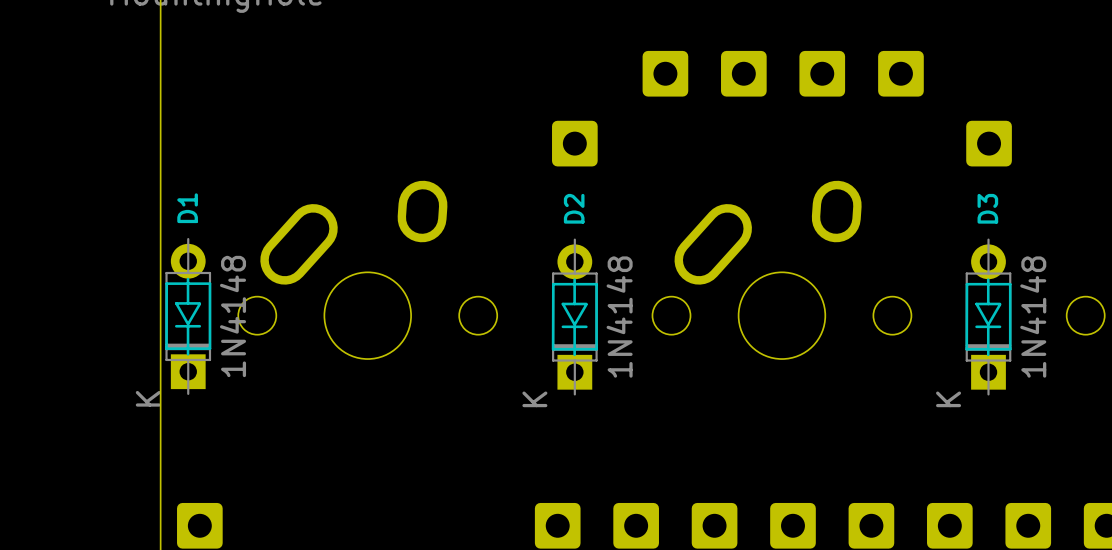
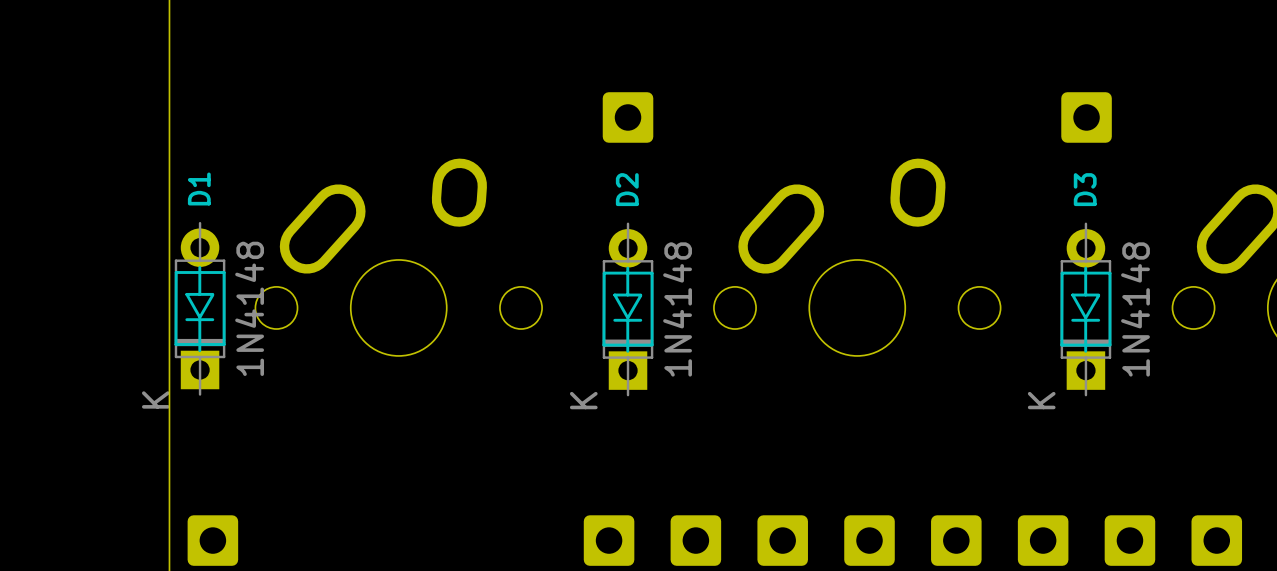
part: (665, 73) -> none
part: (743, 73) -> none
part: (822, 73) -> none
part: (900, 73) -> none

